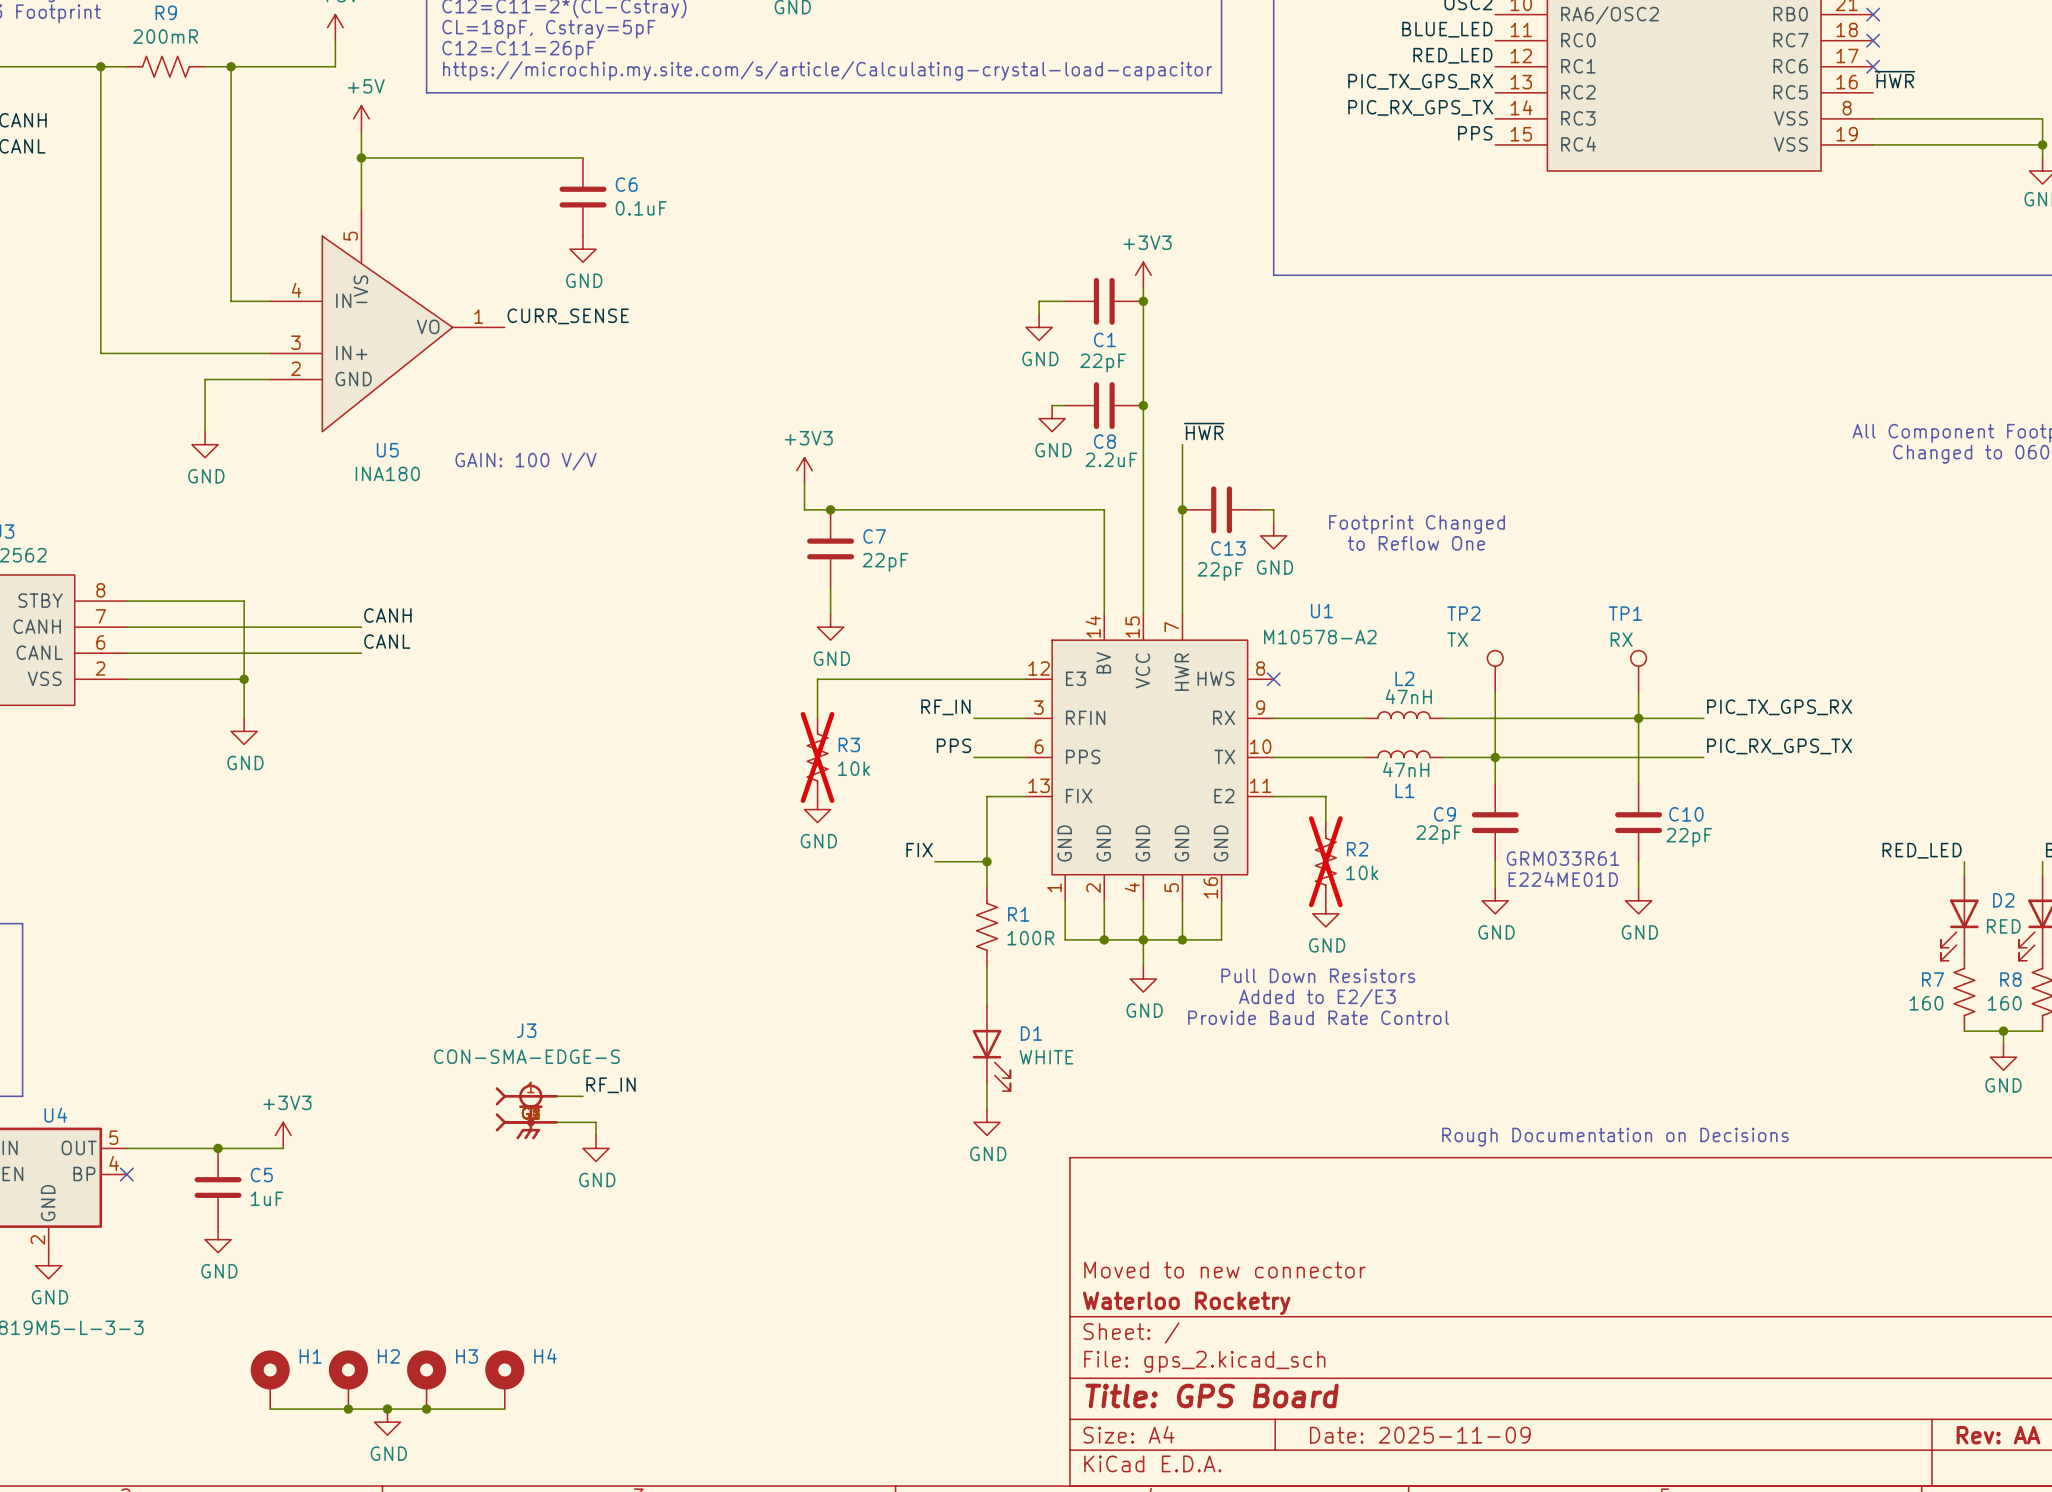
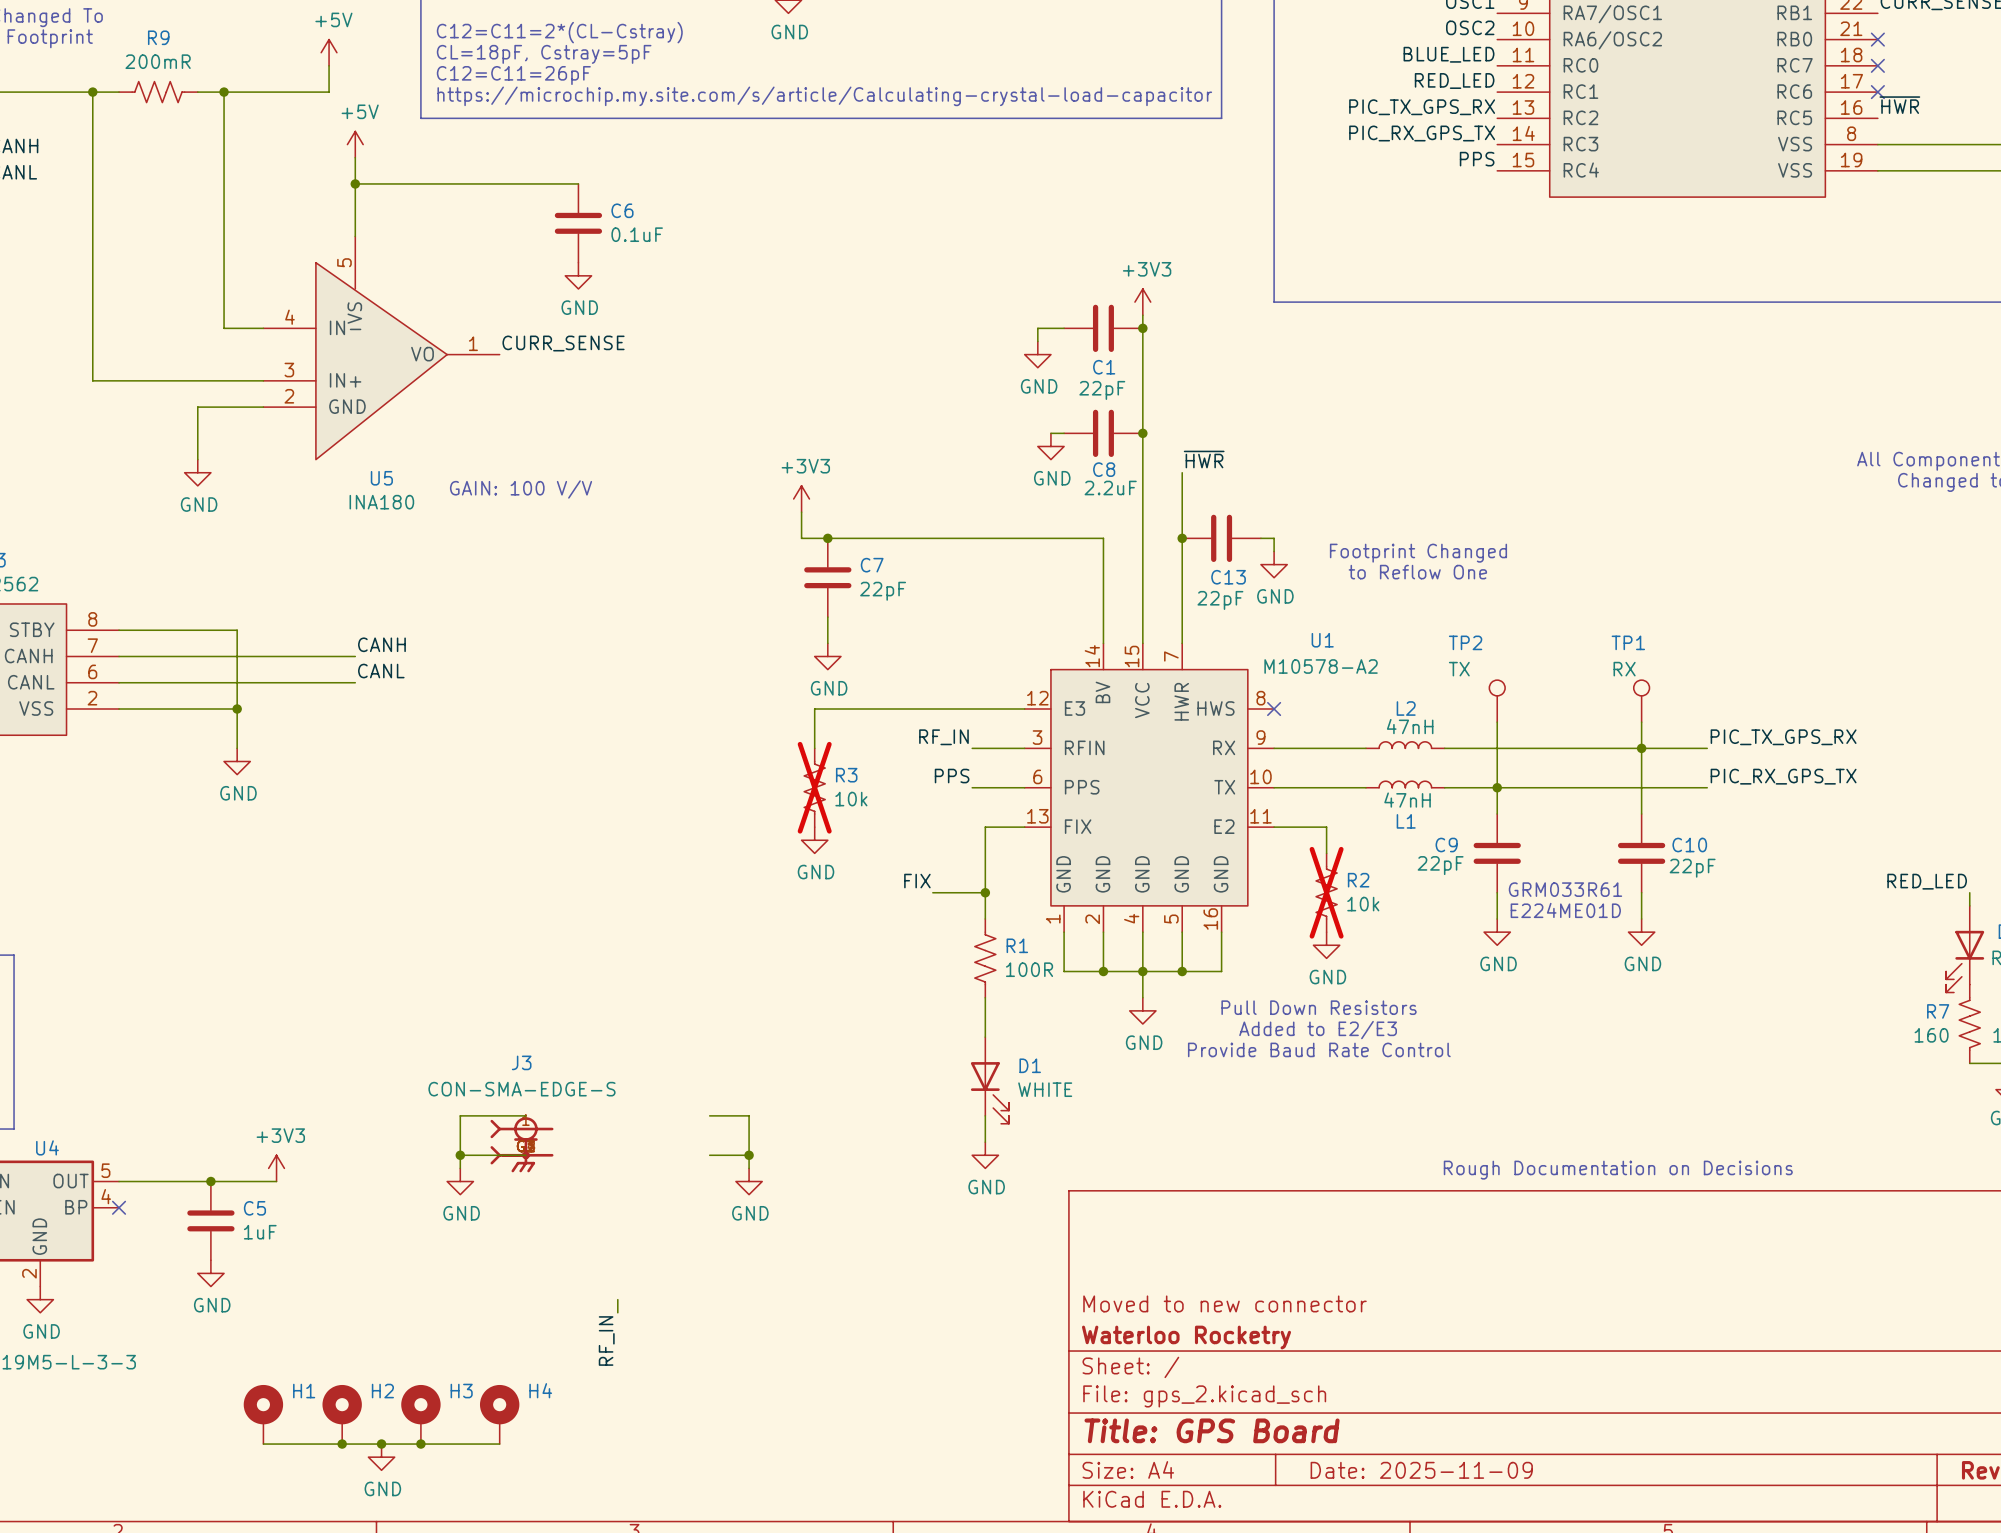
wire: none -> (525, 1115) (460, 1115) (460, 1168)
wire: none -> (709, 1115) (749, 1115) (749, 1168)
label rotation: 0° (611, 1085) -> 90° counterclockwise (606, 1341)
label position: RF_IN (611, 1085) -> RF_IN (606, 1341)
wire: (556, 1096) (582, 1096) -> none
wire: none -> (460, 1155) (525, 1155)
junction: none -> (460, 1155)
wire: (556, 1122) (596, 1122) (596, 1135) -> none
wire: none -> (709, 1155) (749, 1155)
junction: none -> (749, 1155)
power symbol: none -> GND (460, 1181)
power symbol: GND (596, 1148) -> none
power symbol: none -> GND (749, 1181)
wire: none -> (617, 1299) (617, 1312)

